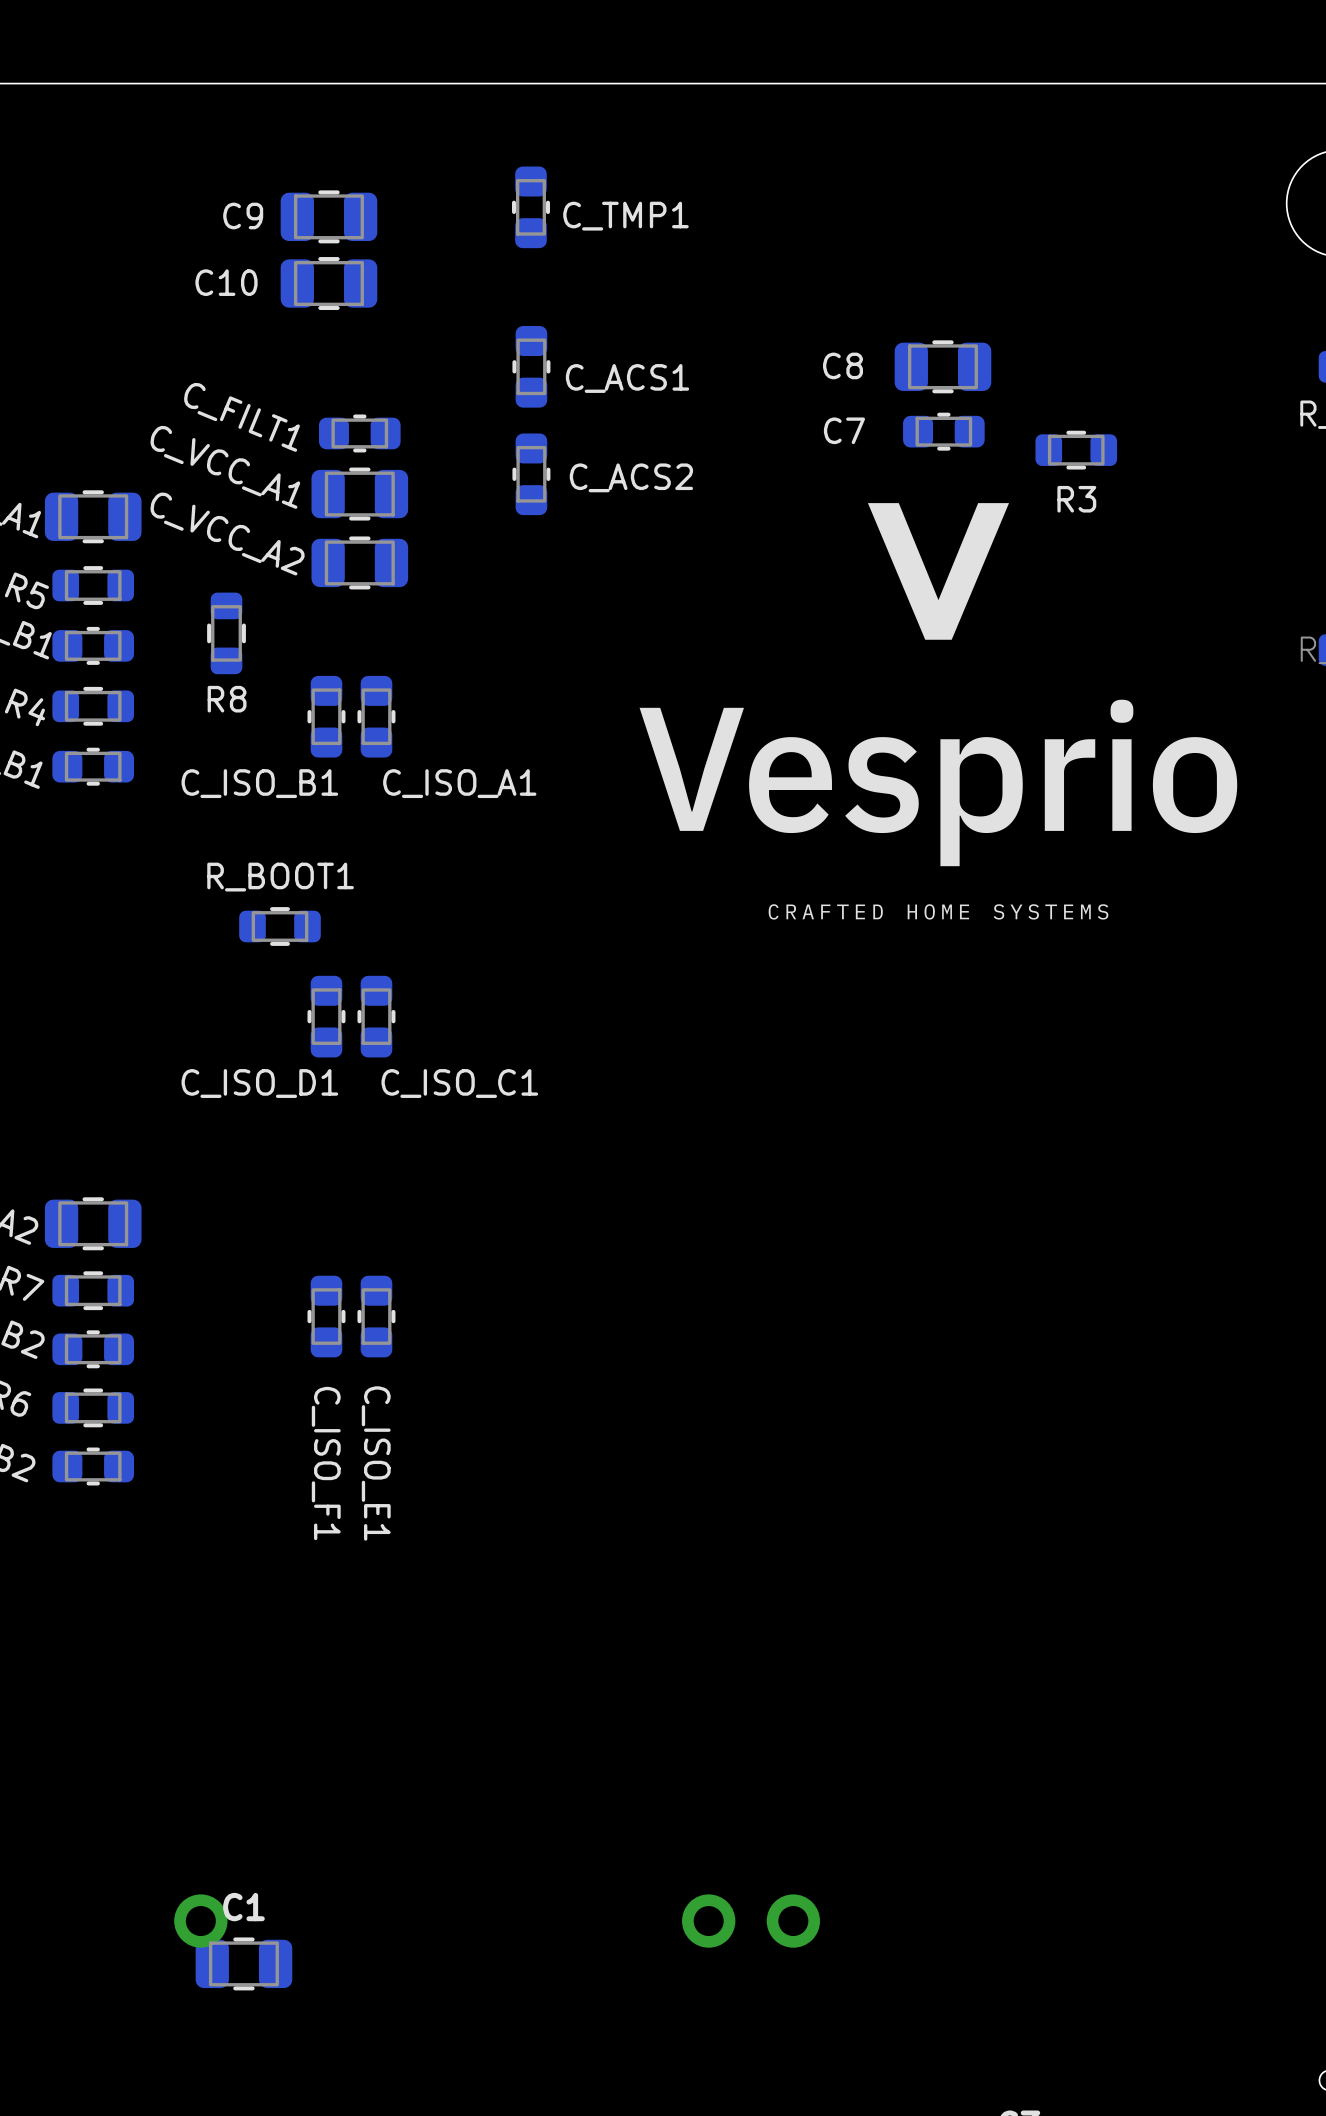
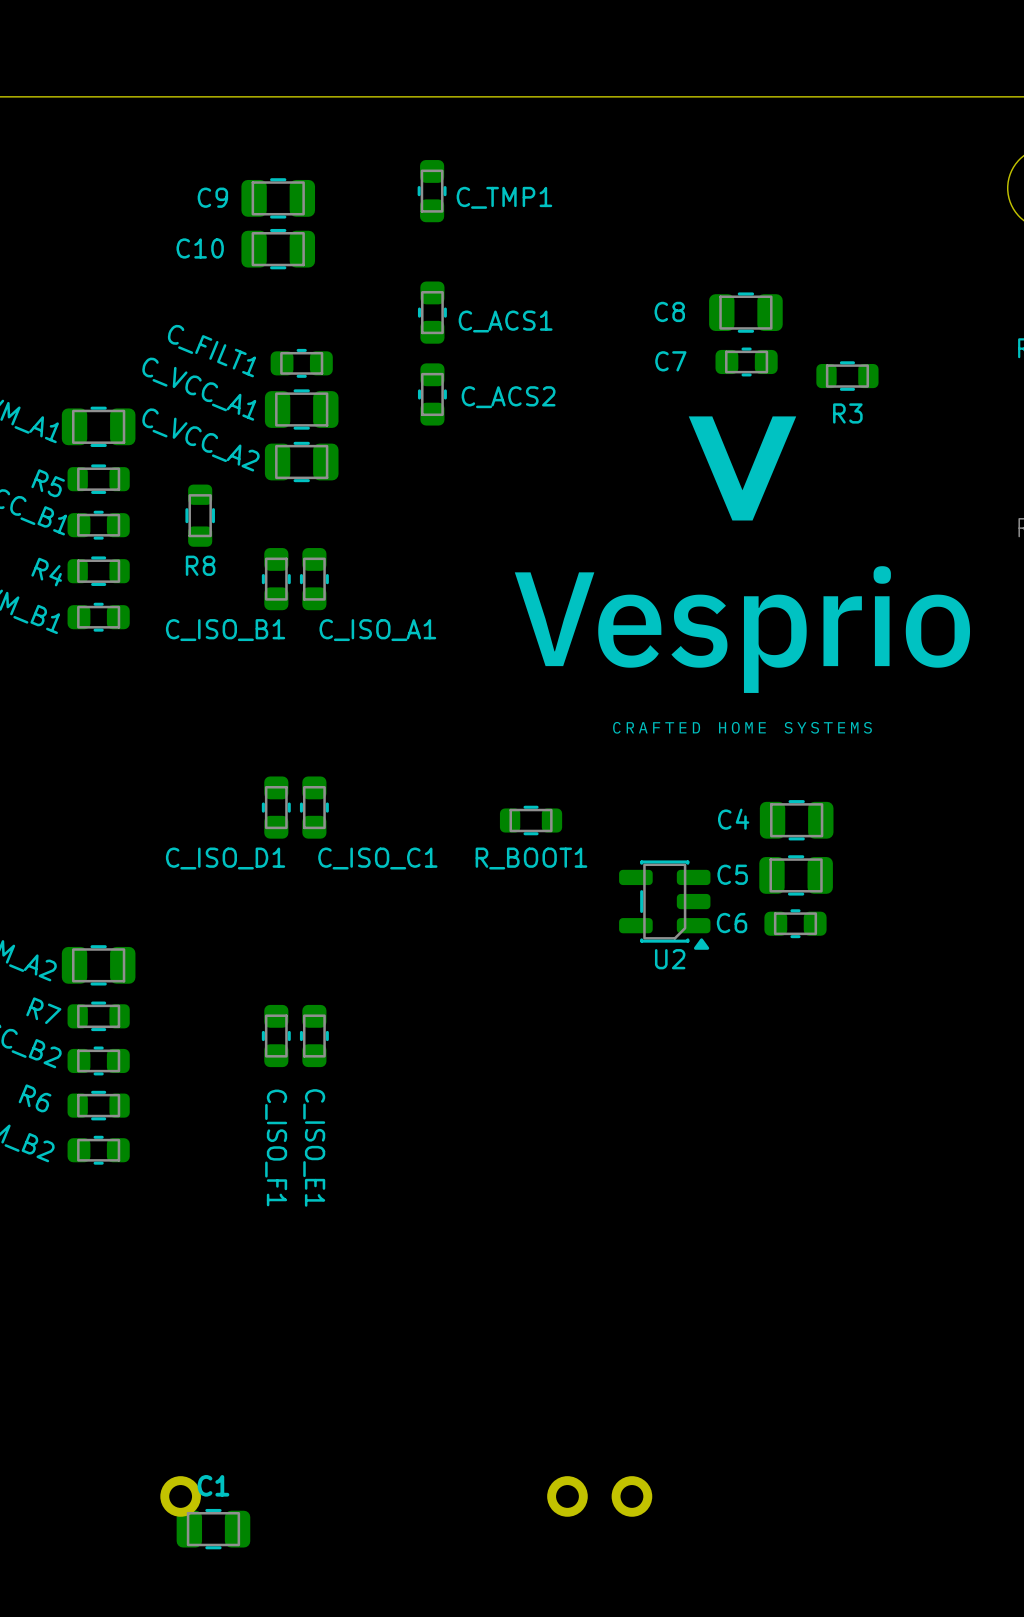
R_BOOT1 name position: R_BOOT1 (280, 877) -> R_BOOT1 (531, 858)
R_BOOT1 position: (280, 926) -> (531, 820)
C4: none -> (796, 820)
C5: none -> (796, 875)
U2: none -> (664, 905)
C6: none -> (795, 923)

